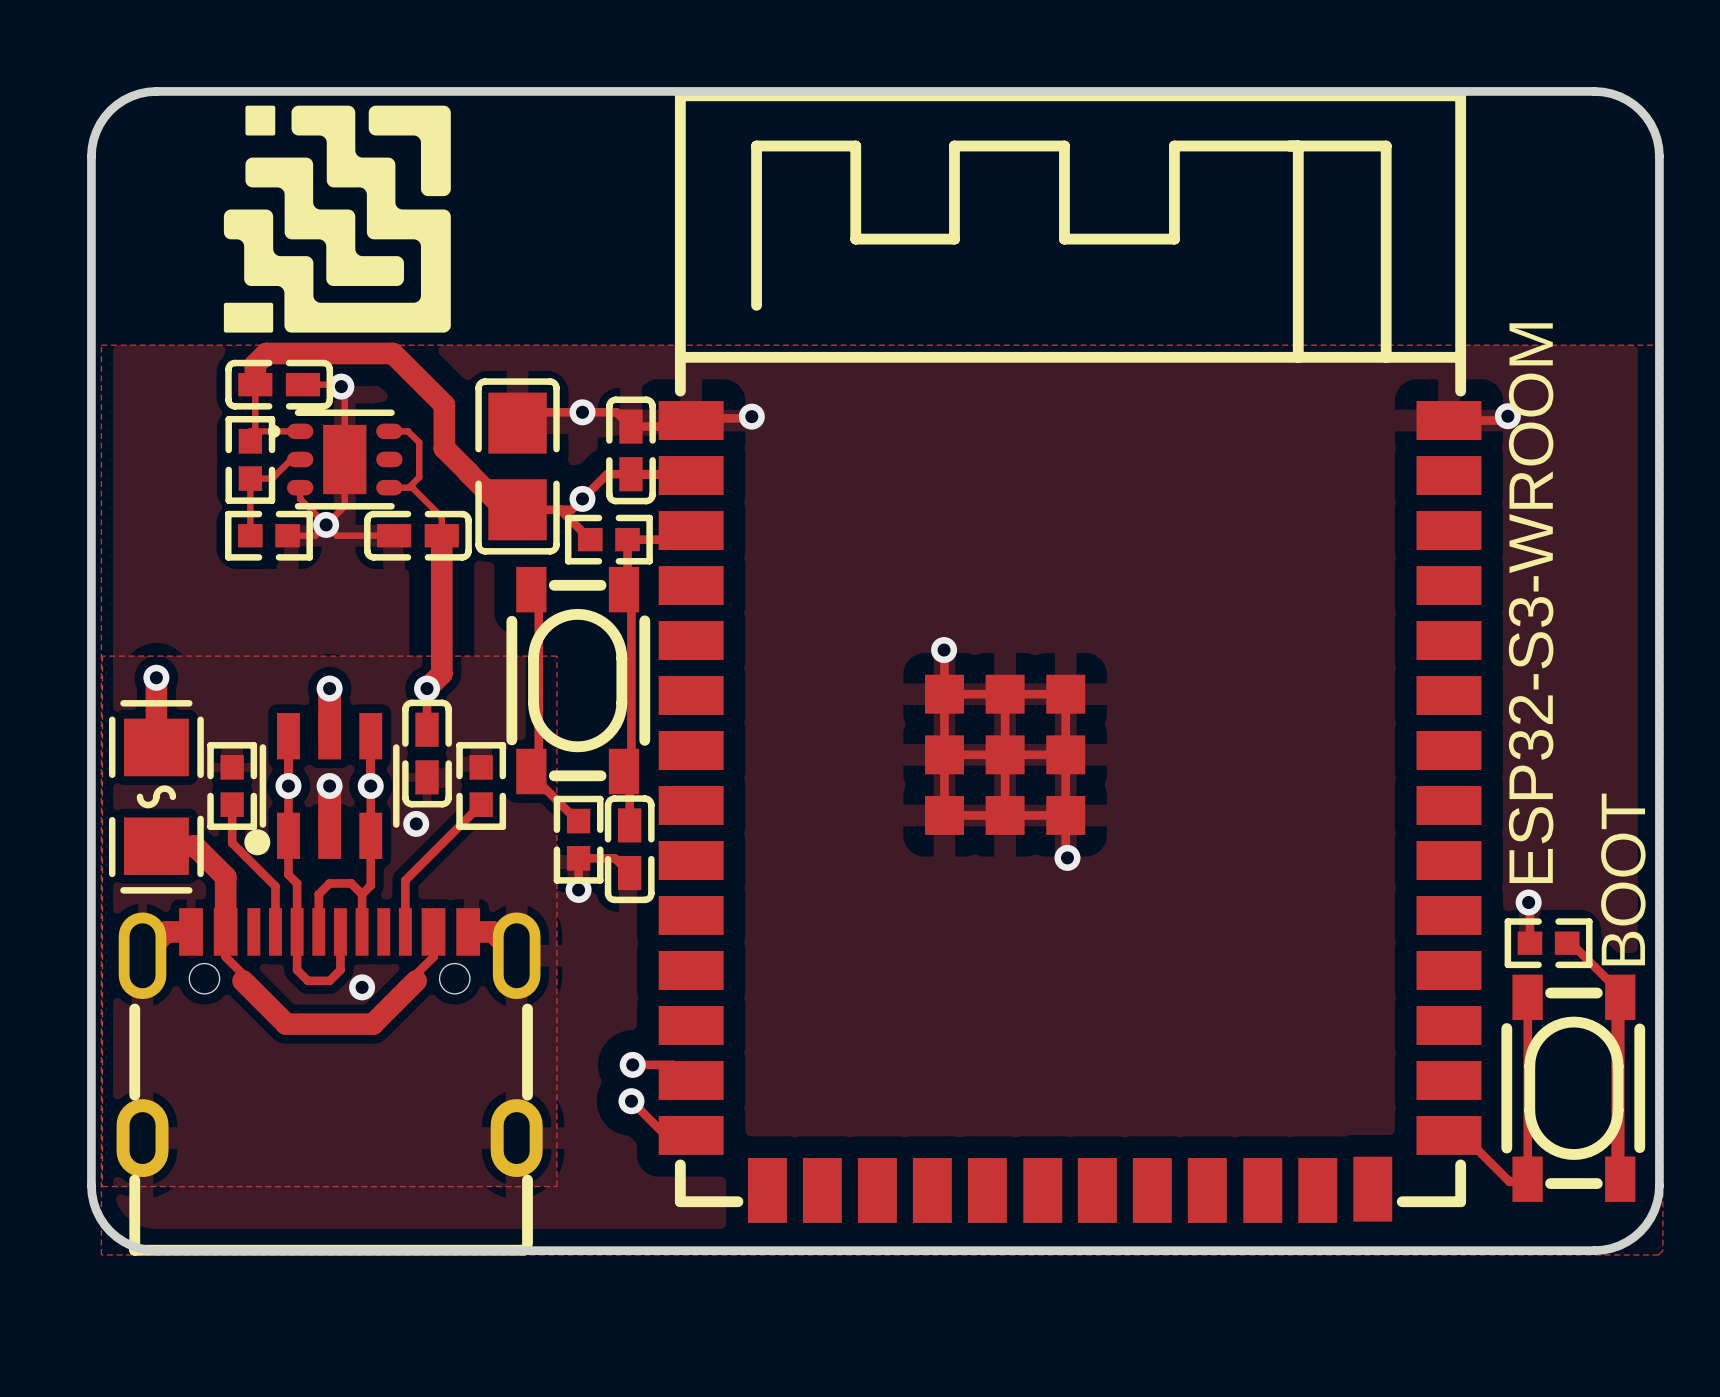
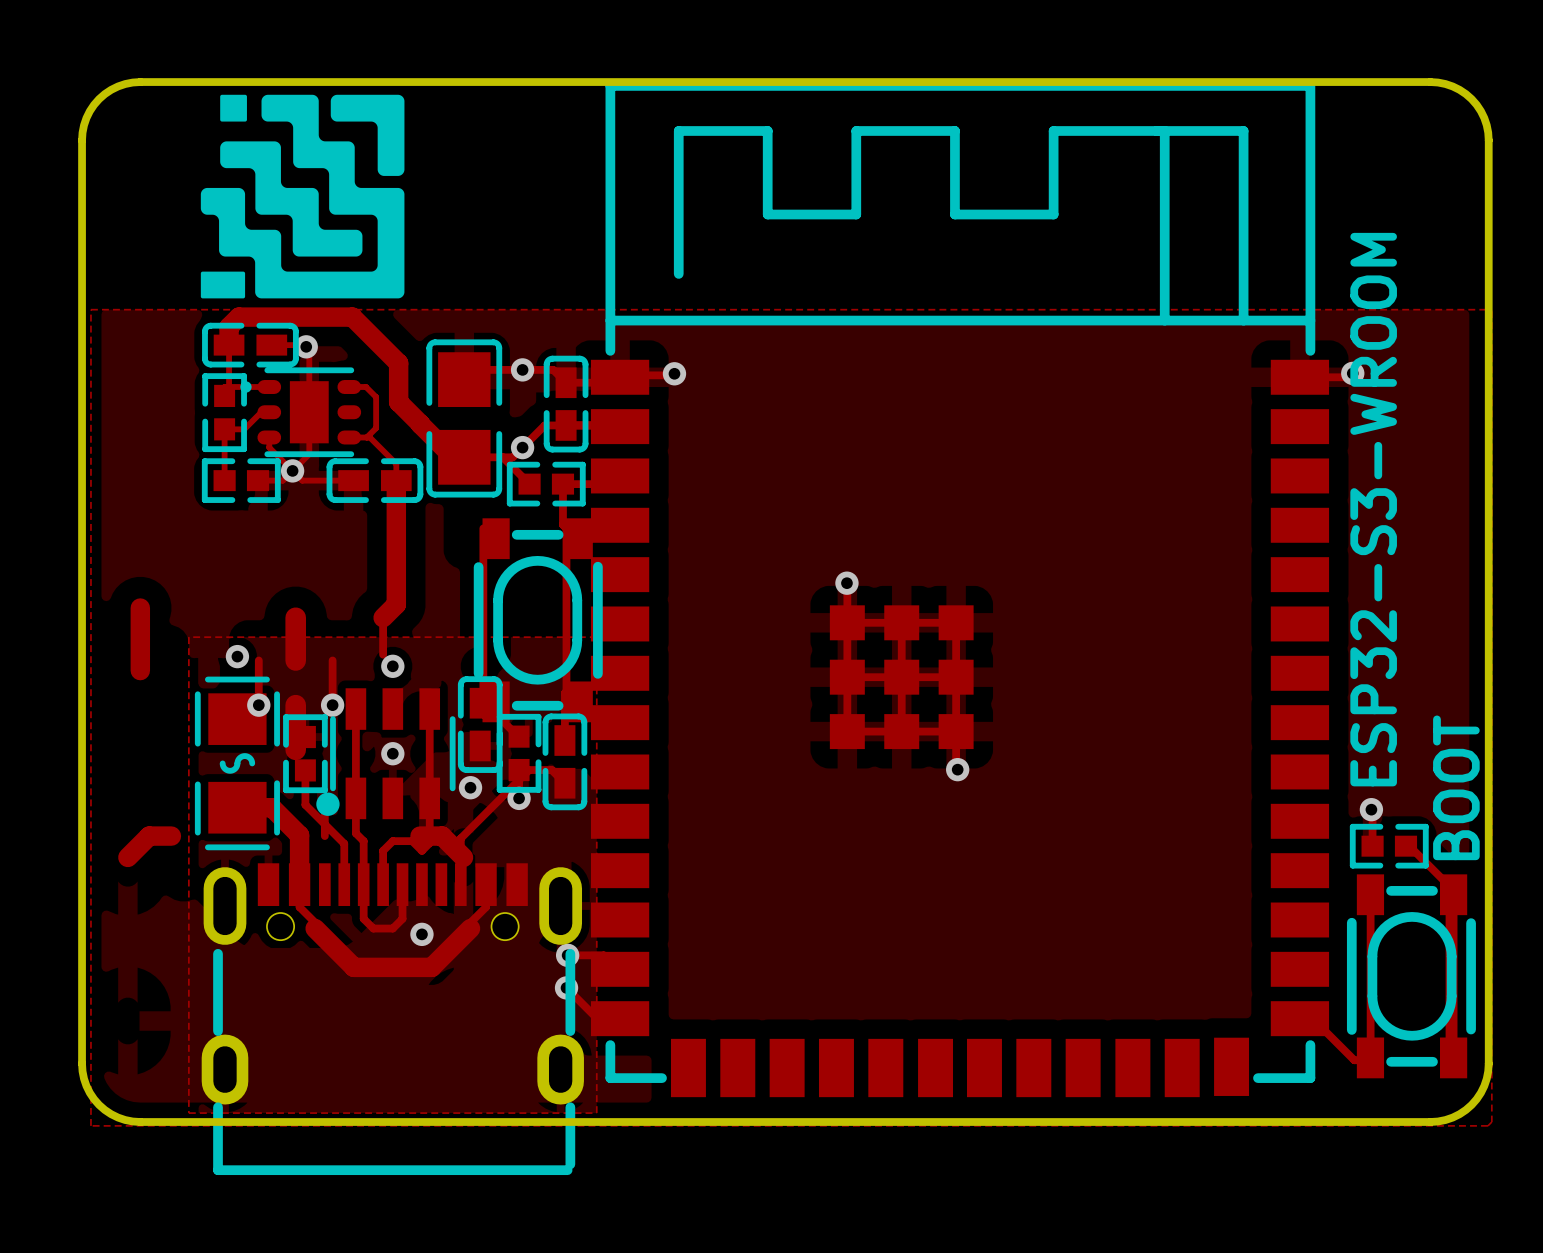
zone outline: (102, 656) (556, 656) (556, 1186) (102, 1186) (102, 656) -> (188, 637) (596, 637) (596, 1113) (188, 1113) (188, 637)
via: (156, 677) -> none
part position: (578, 680) -> (538, 620)
via: (329, 688) -> none
via: (427, 688) -> none
via: none -> (237, 656)
via: none -> (392, 666)
part position: (427, 753) -> (480, 724)
part: (232, 786) -> none
track: (288, 786) (288, 874) (297, 883) (297, 970) (307, 980) (329, 980) (340, 970) (340, 931) -> none
part position: (321, 786) -> (385, 753)
via: (329, 786) -> none
track: (370, 786) (370, 885) (362, 894) (351, 883) (329, 883) (318, 894) (318, 931) -> none
part: (481, 786) -> none
track: none -> (355, 709) (355, 833) (363, 841) (363, 918) (373, 928) (392, 928) (402, 918) (402, 884)
track: none -> (429, 709) (429, 843) (421, 850) (412, 841) (392, 841) (383, 850) (383, 884)
part position: (156, 796) -> (237, 763)
track: (232, 804) (232, 843) (275, 886) (275, 931) -> (305, 770) (305, 804) (344, 843) (344, 884)
track: (481, 804) (405, 880) (405, 931) -> (528, 770) (460, 838) (460, 884)
via position: (416, 823) -> (392, 753)
part: none -> (305, 753)
track: (156, 846) (194, 846) (225, 876) (225, 957) (243, 974) (243, 980) (286, 1024) (372, 1024) (416, 980) (416, 974) (433, 957) (433, 931) -> (237, 807) (272, 807) (299, 835) (299, 907) (315, 922) (315, 928) (353, 967) (431, 967) (470, 928) (470, 922) (486, 907) (486, 884)
via: none -> (470, 787)
via: (362, 987) -> none
via: none -> (421, 934)
part position: (329, 1081) -> (392, 1019)

